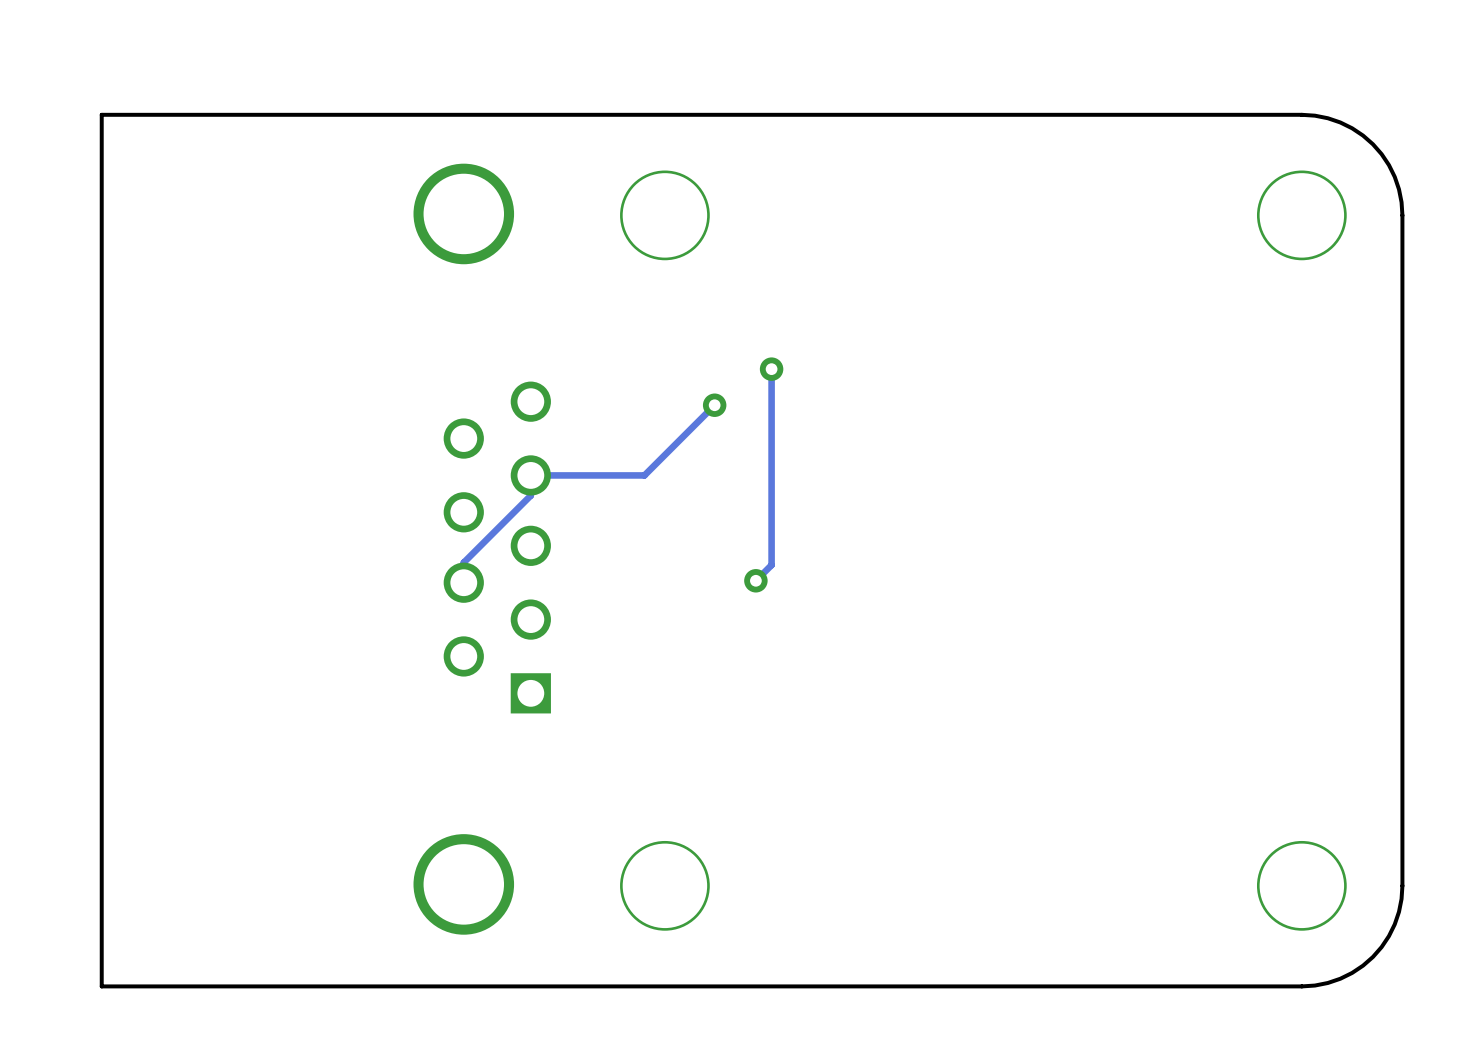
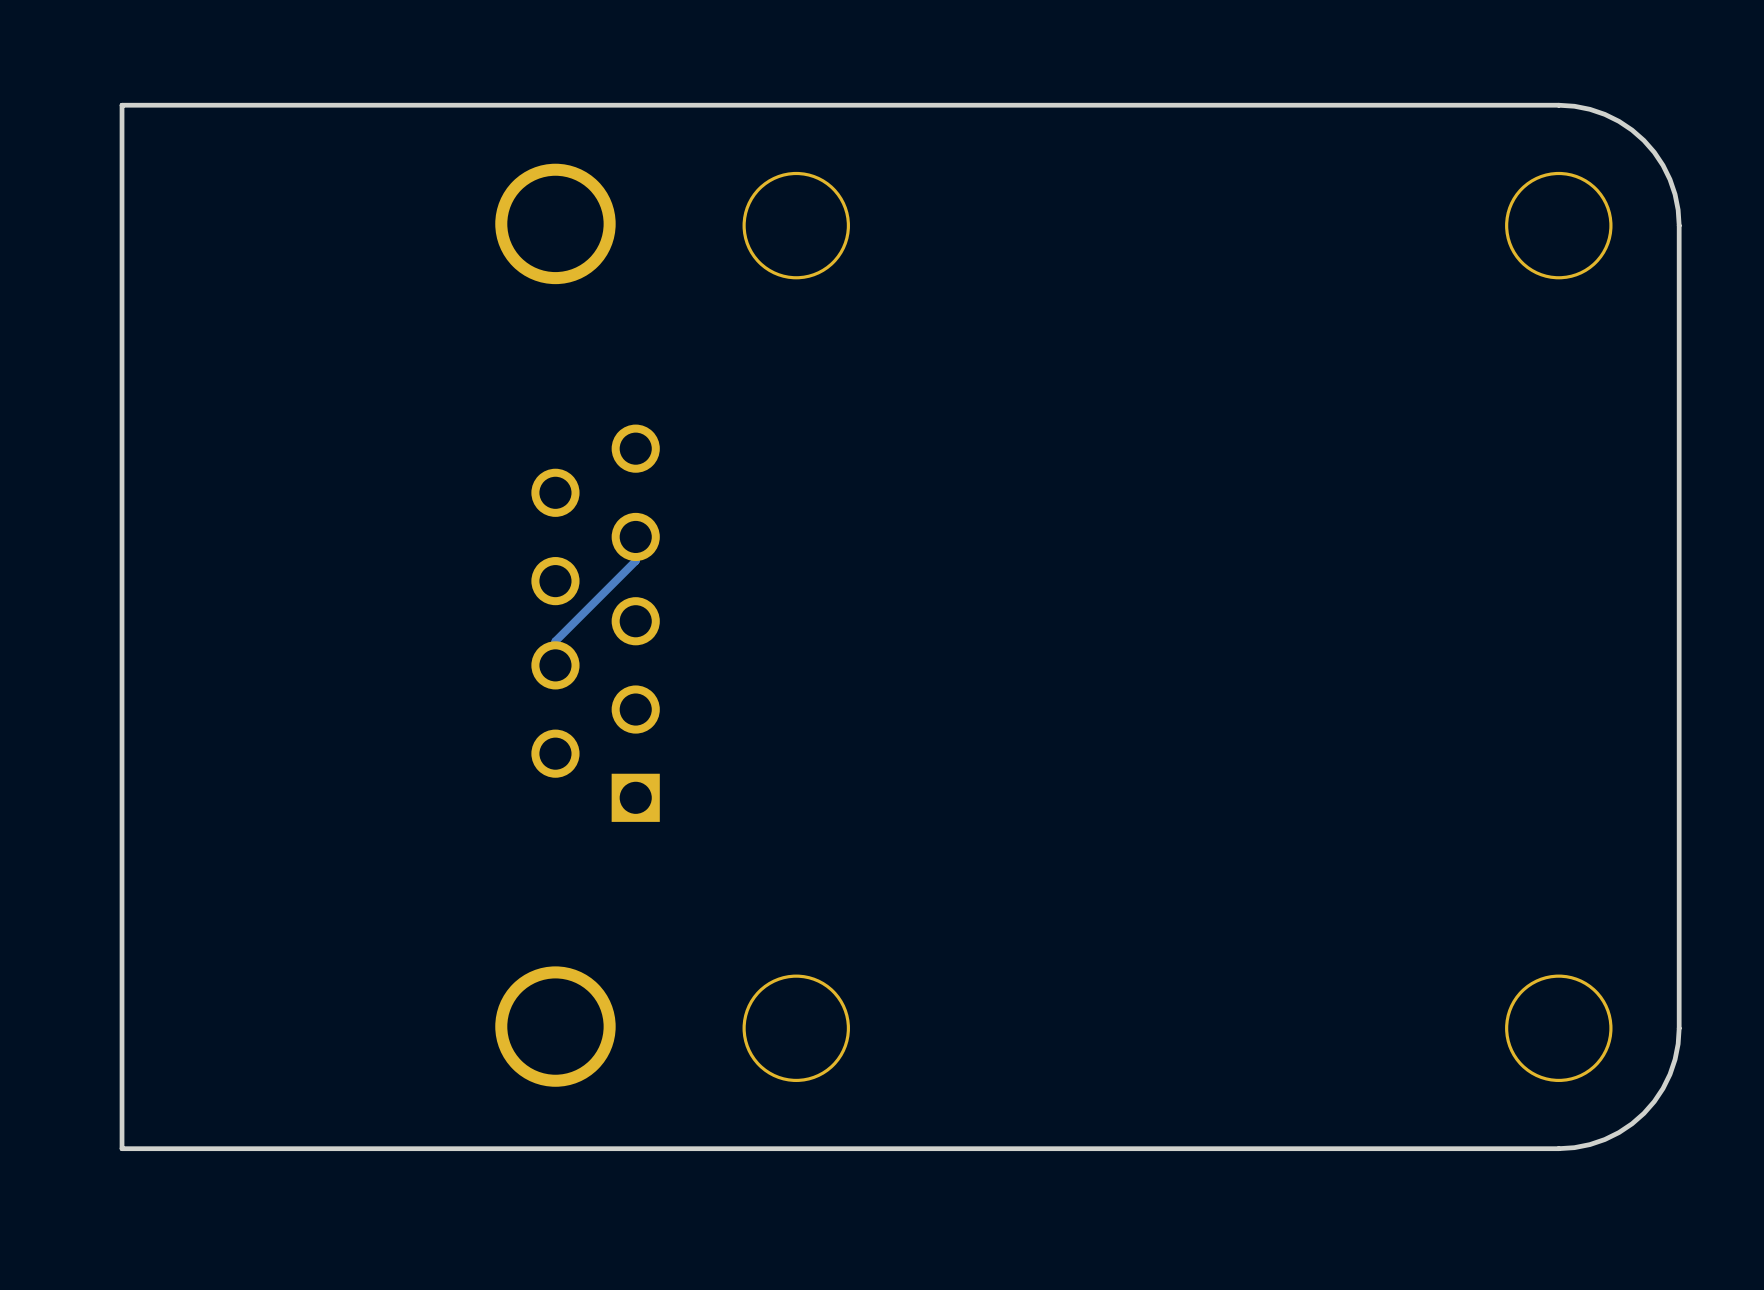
track: (771, 369) (771, 565) (755, 580) -> none
via: (771, 369) -> none
track: (714, 405) (644, 475) (530, 475) -> none
via: (714, 405) -> none
via: (755, 580) -> none

